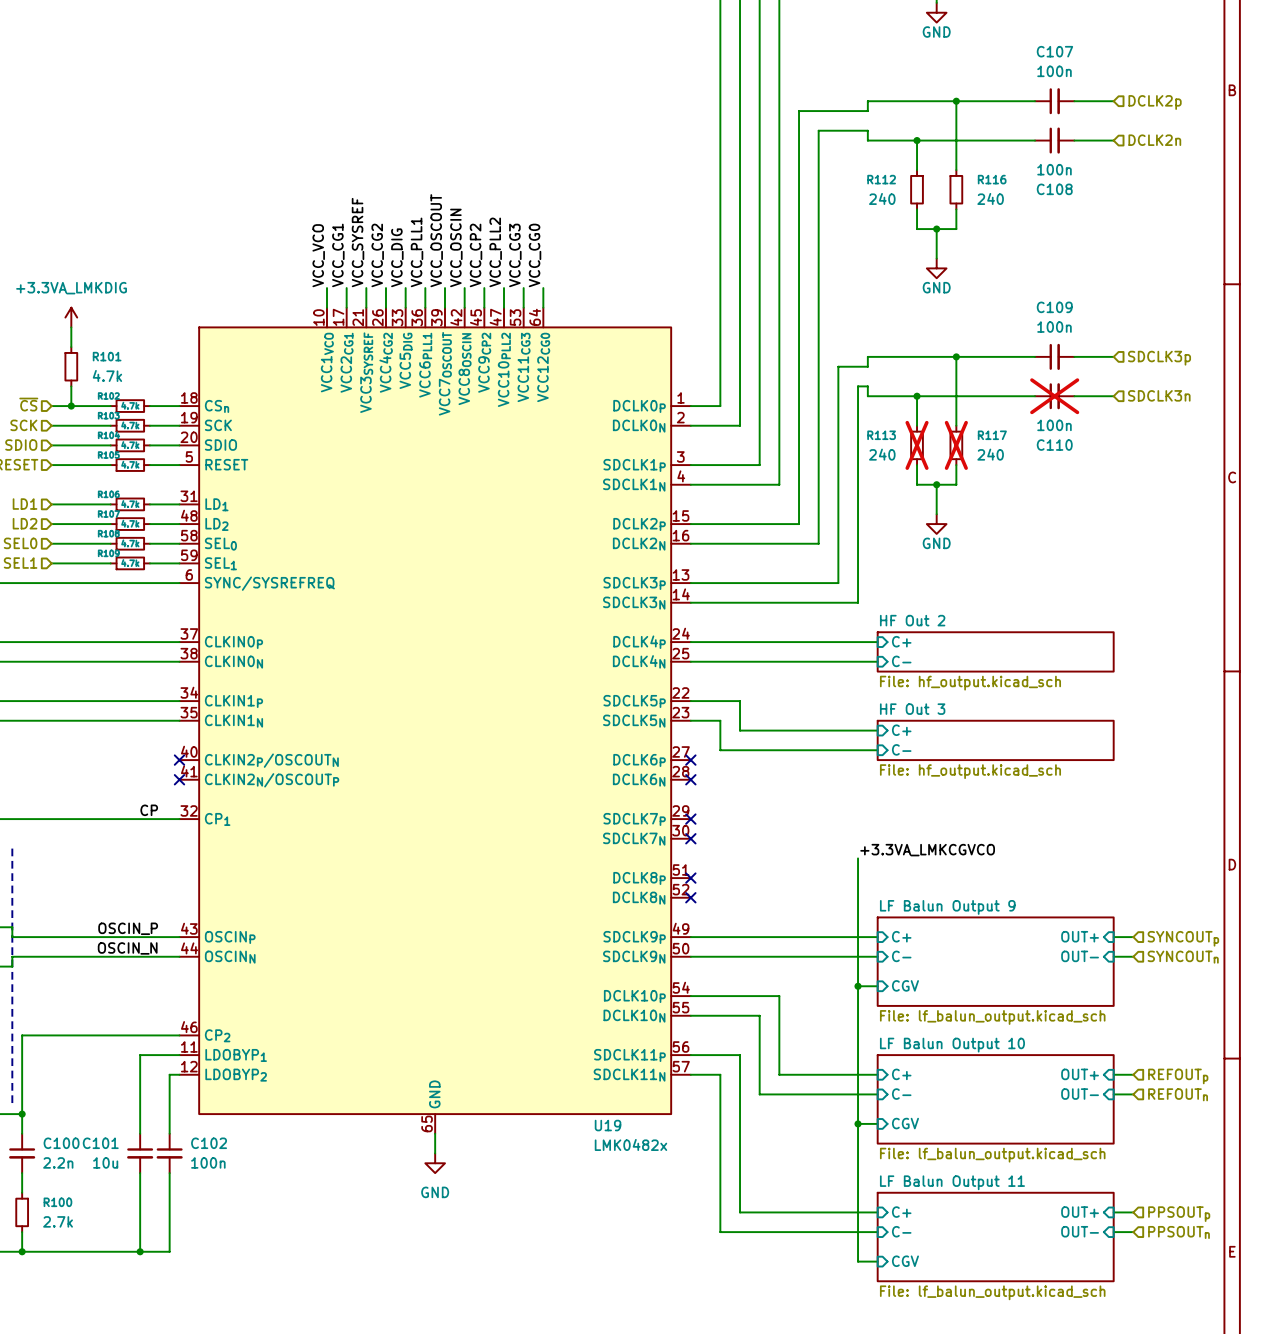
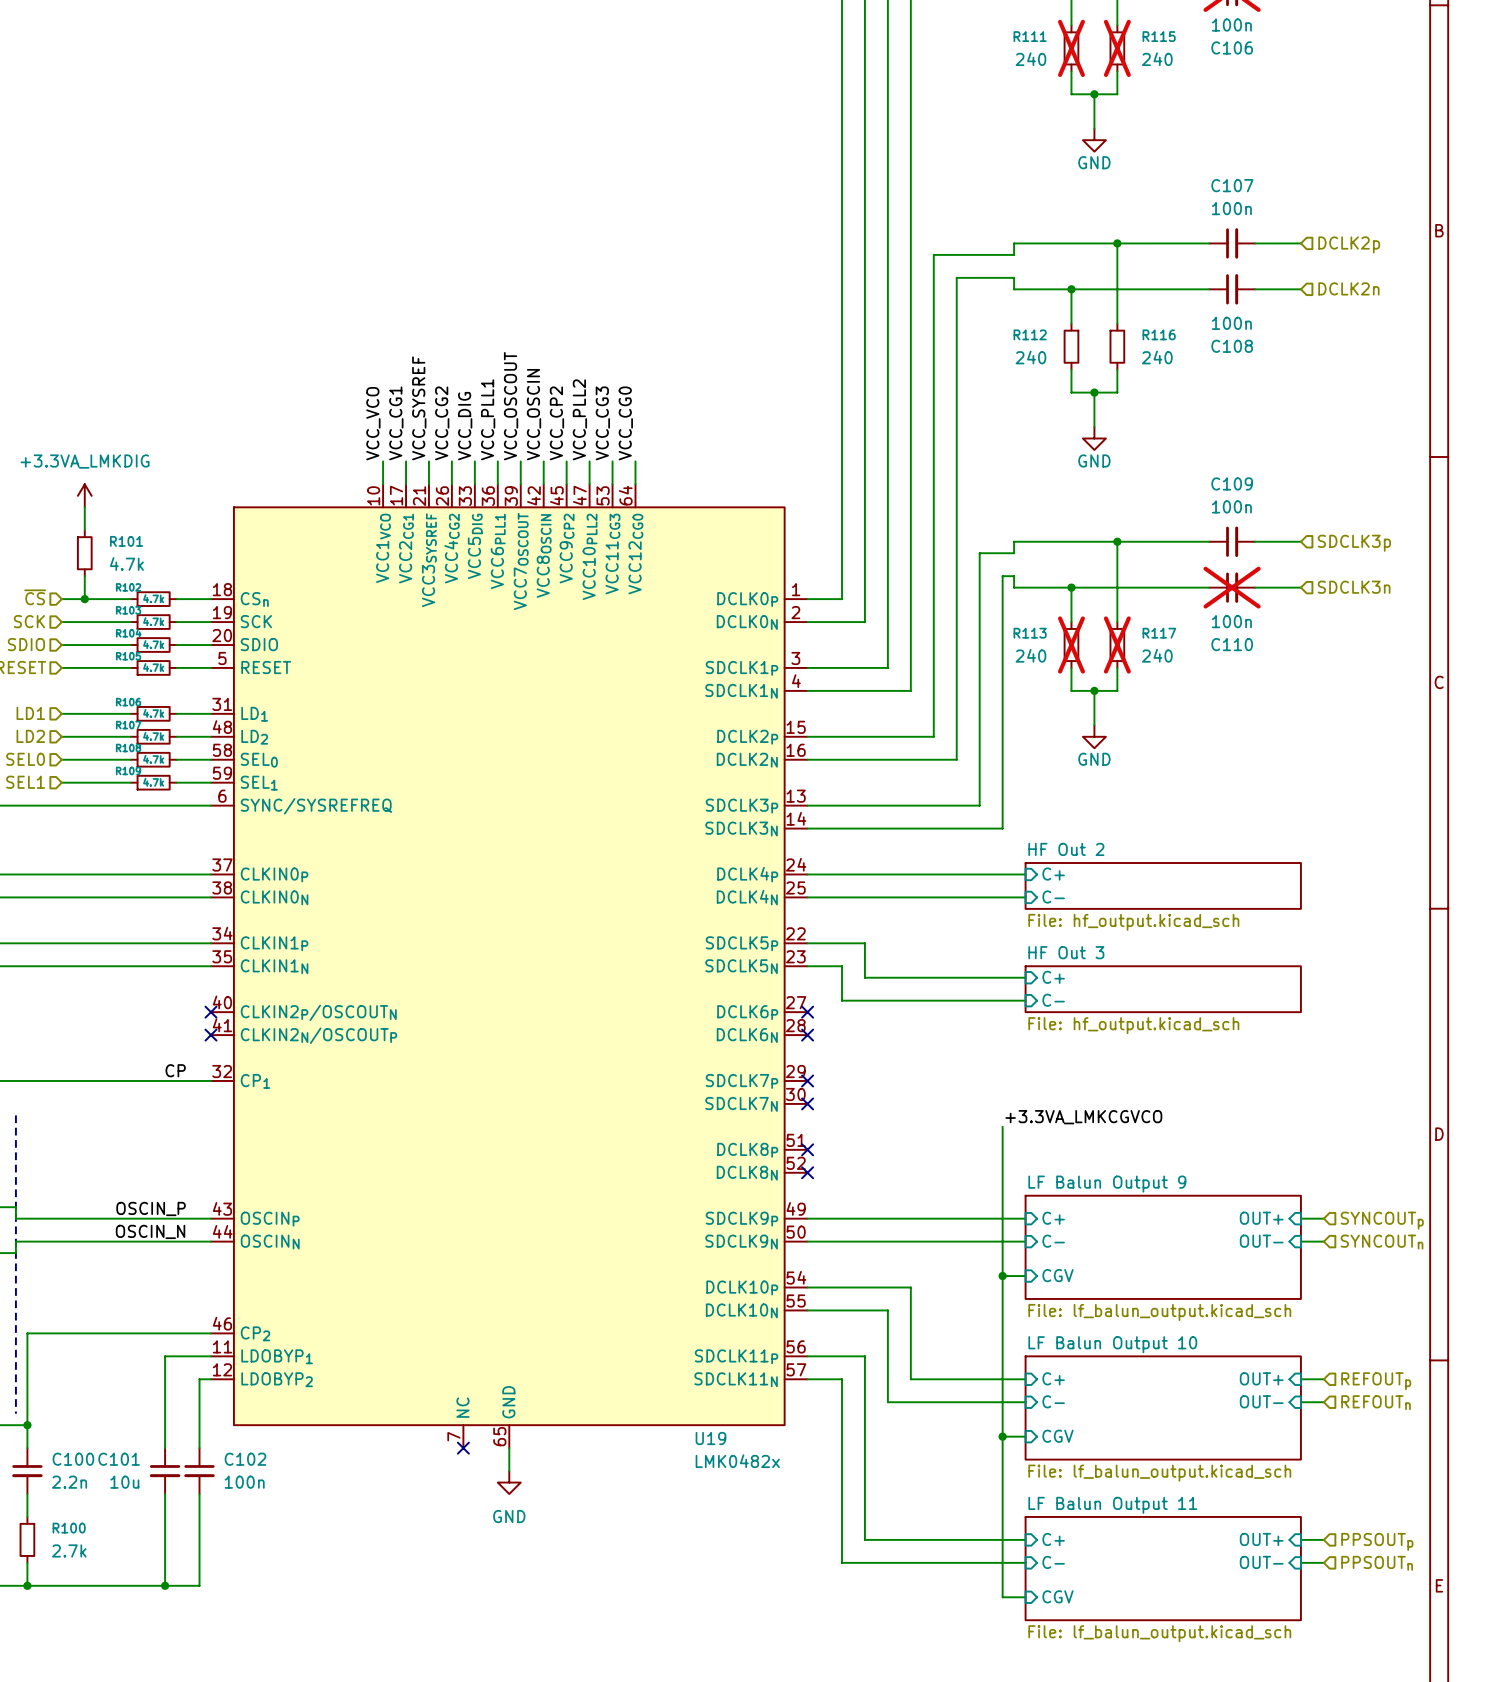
U19 symbol: [179, 307, 691, 1134] -> [210, 484, 808, 1449]
no-connect mark: none -> (463, 1448)

